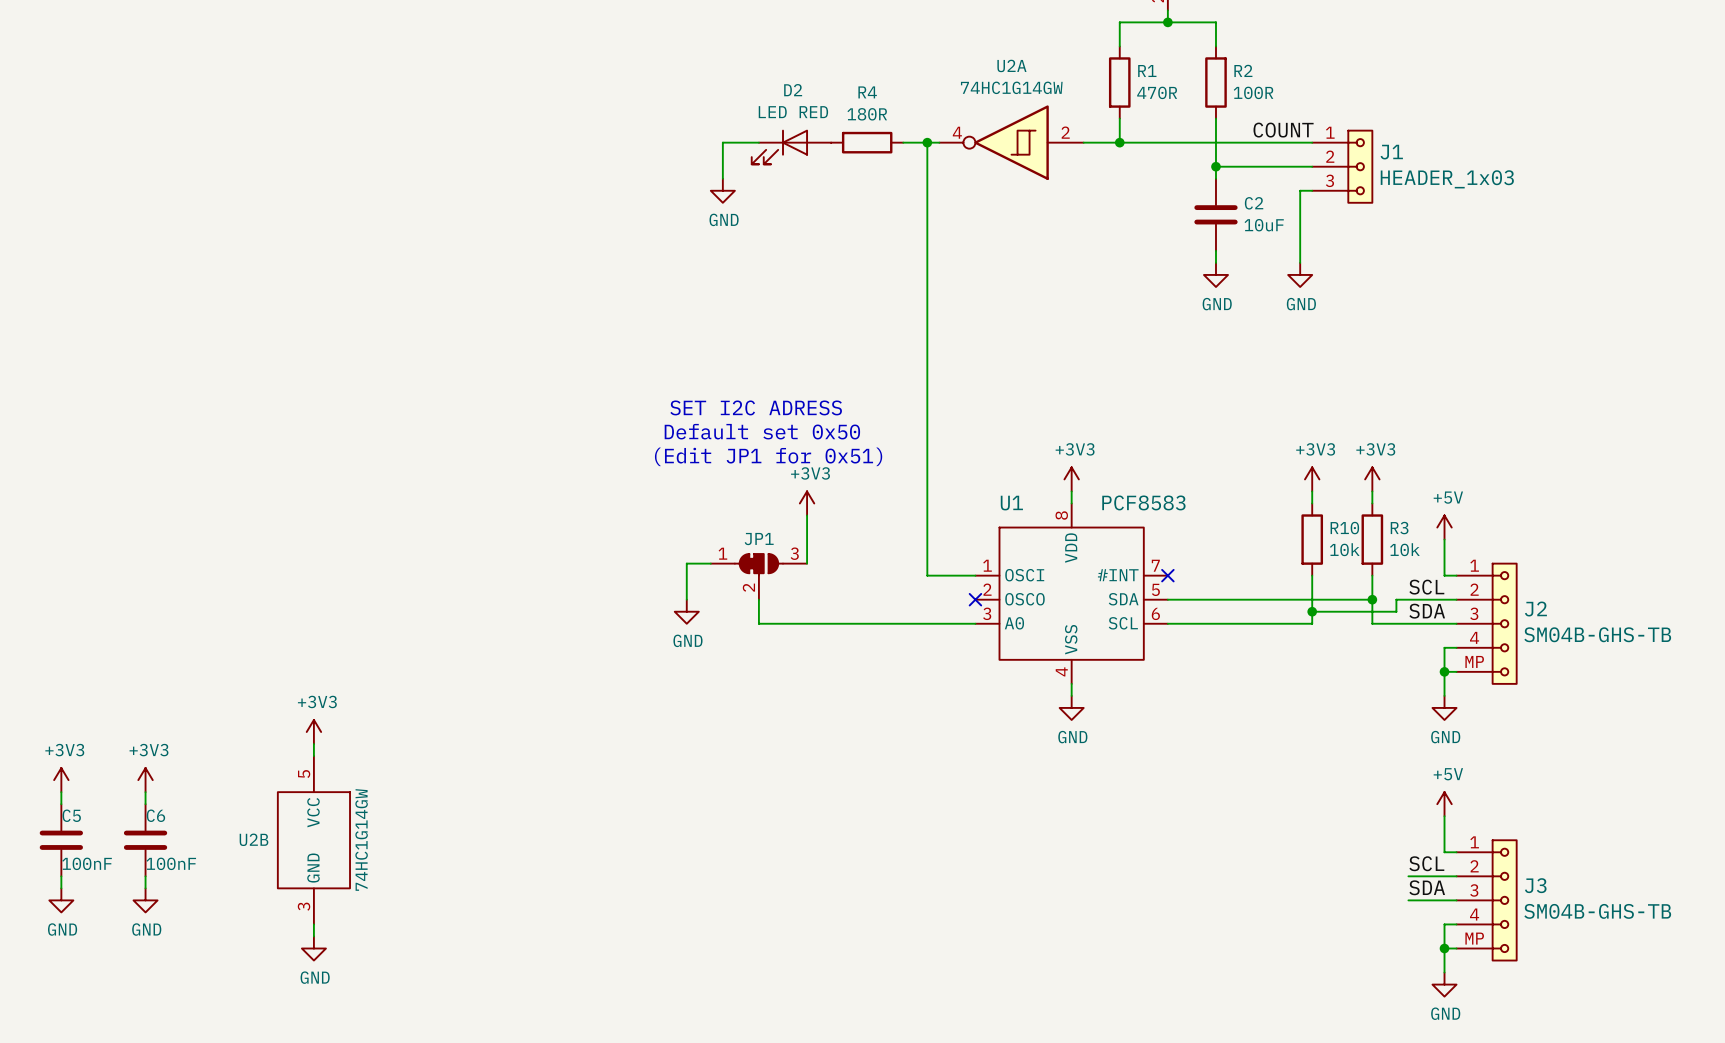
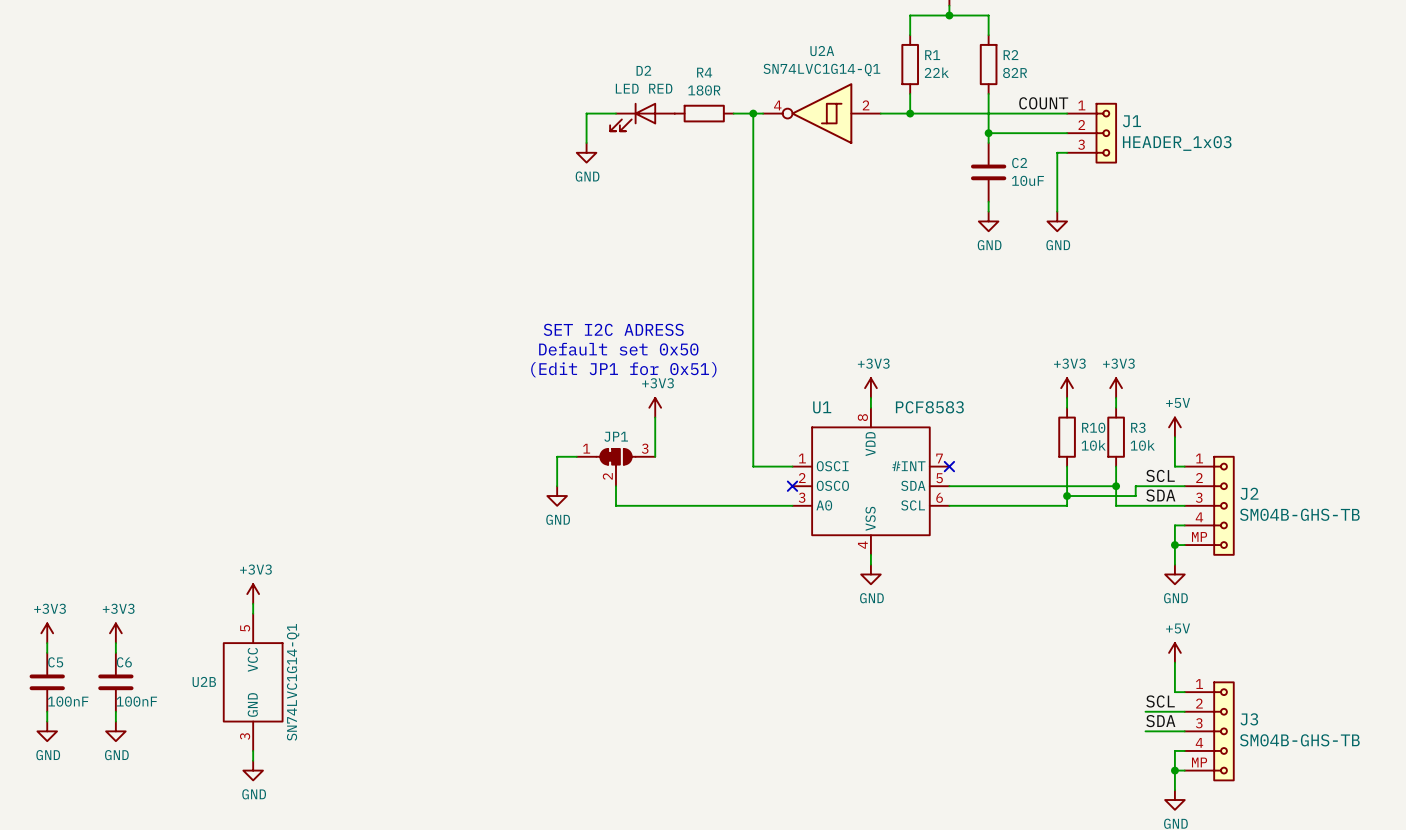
U2A value: 74HC1G14GW (1011, 87) -> SN74LVC1G14-Q1 (821, 69)
R1 value: 470R (1157, 92) -> 22k (936, 72)
R2 value: 100R (1253, 92) -> 82R (1015, 73)
U2B value: 74HC1G14GW (361, 839) -> SN74LVC1G14-Q1 (293, 682)

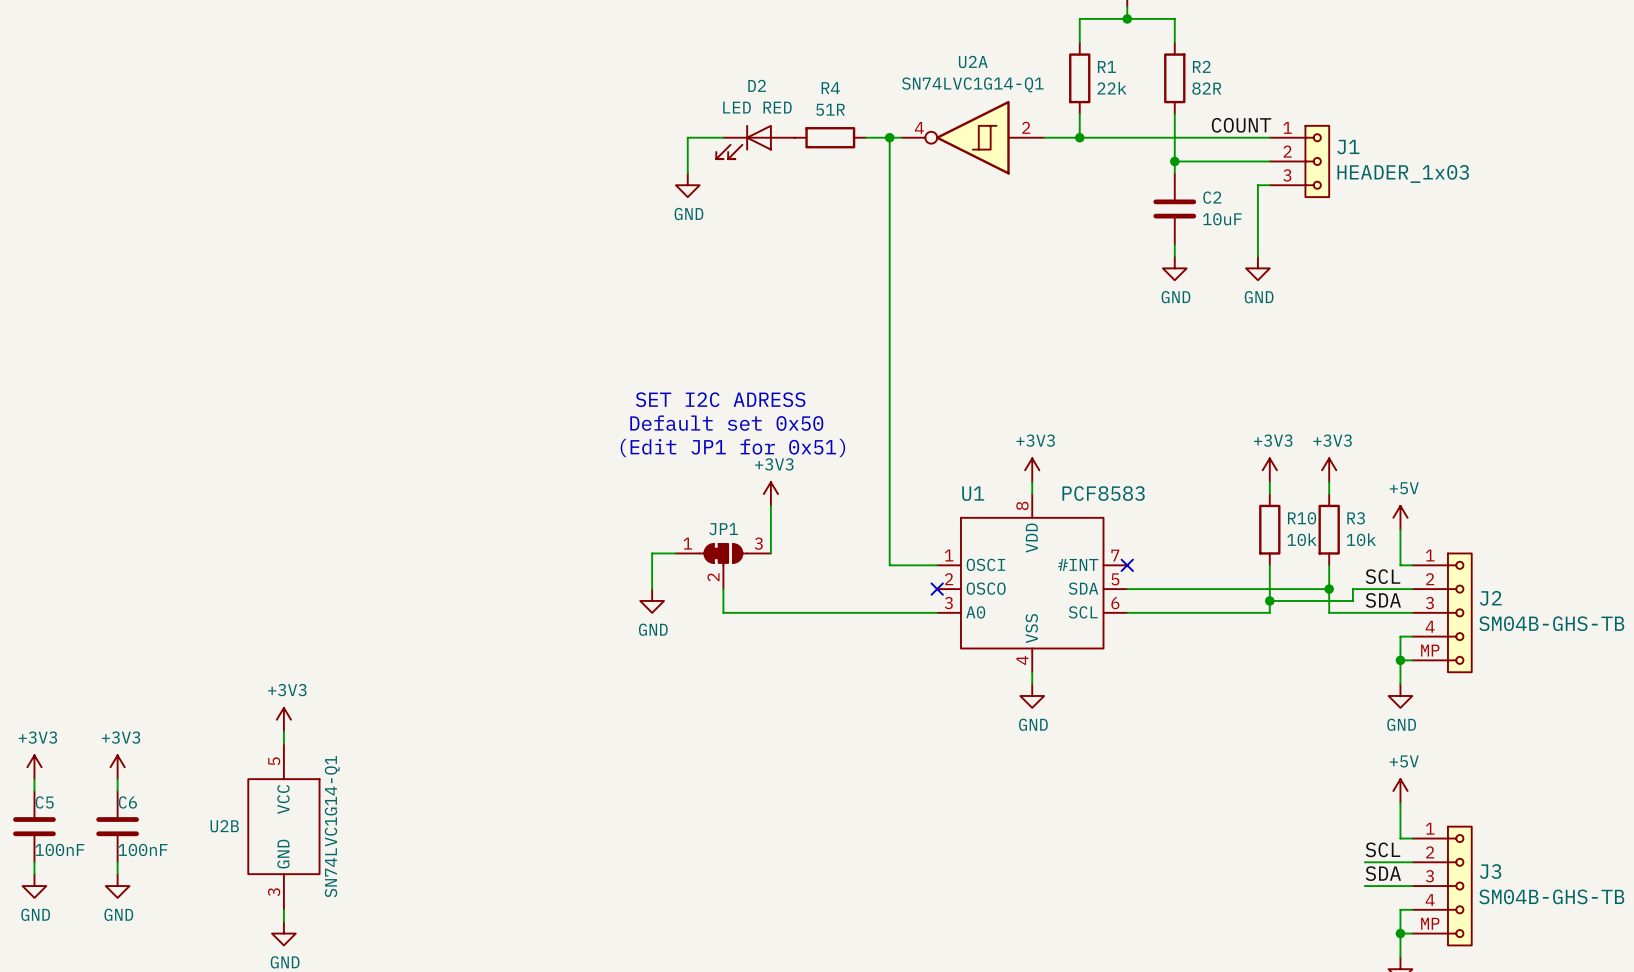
R4 value: 180R (704, 90) -> 51R (830, 109)

